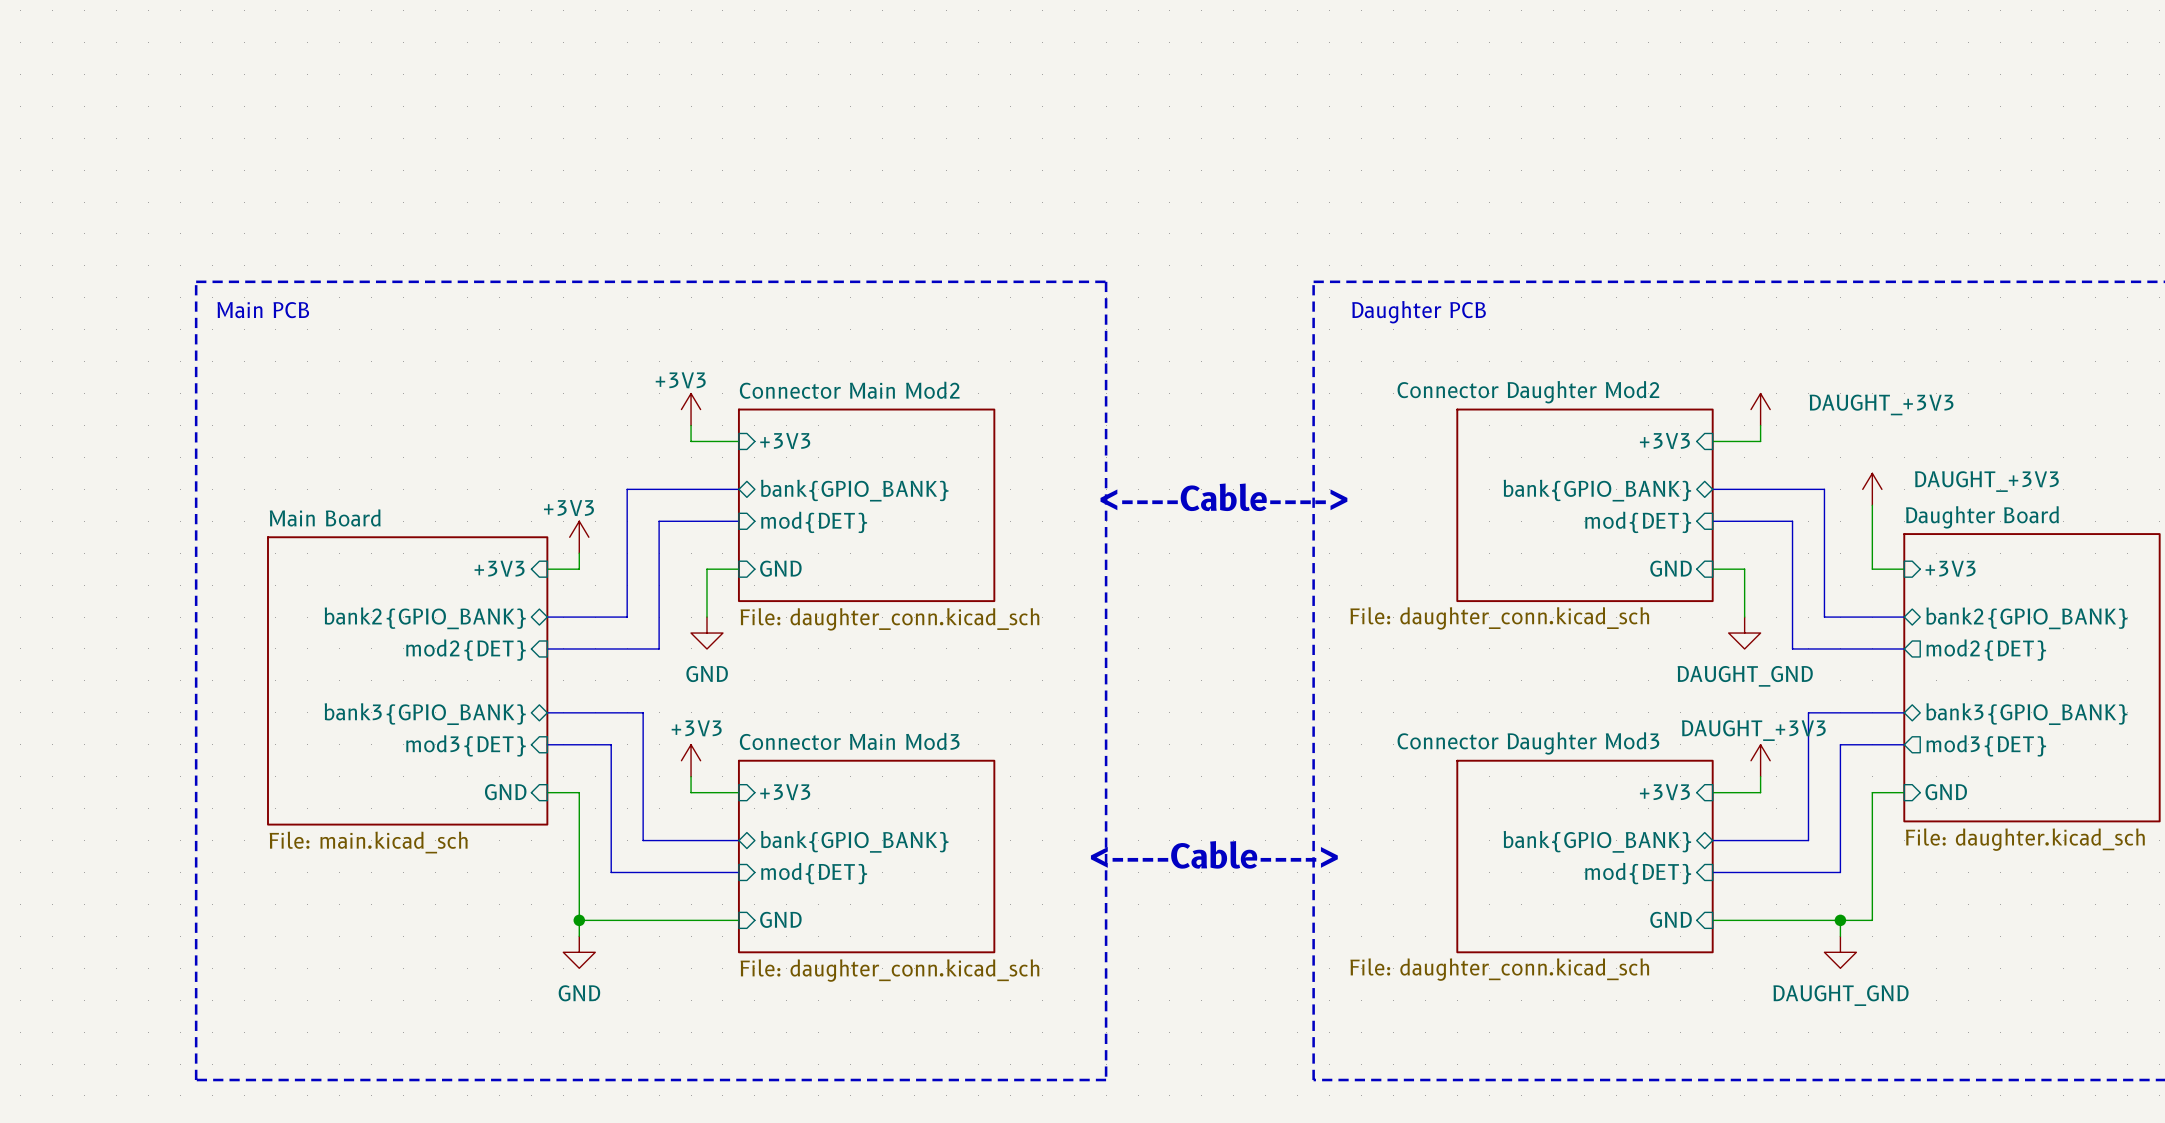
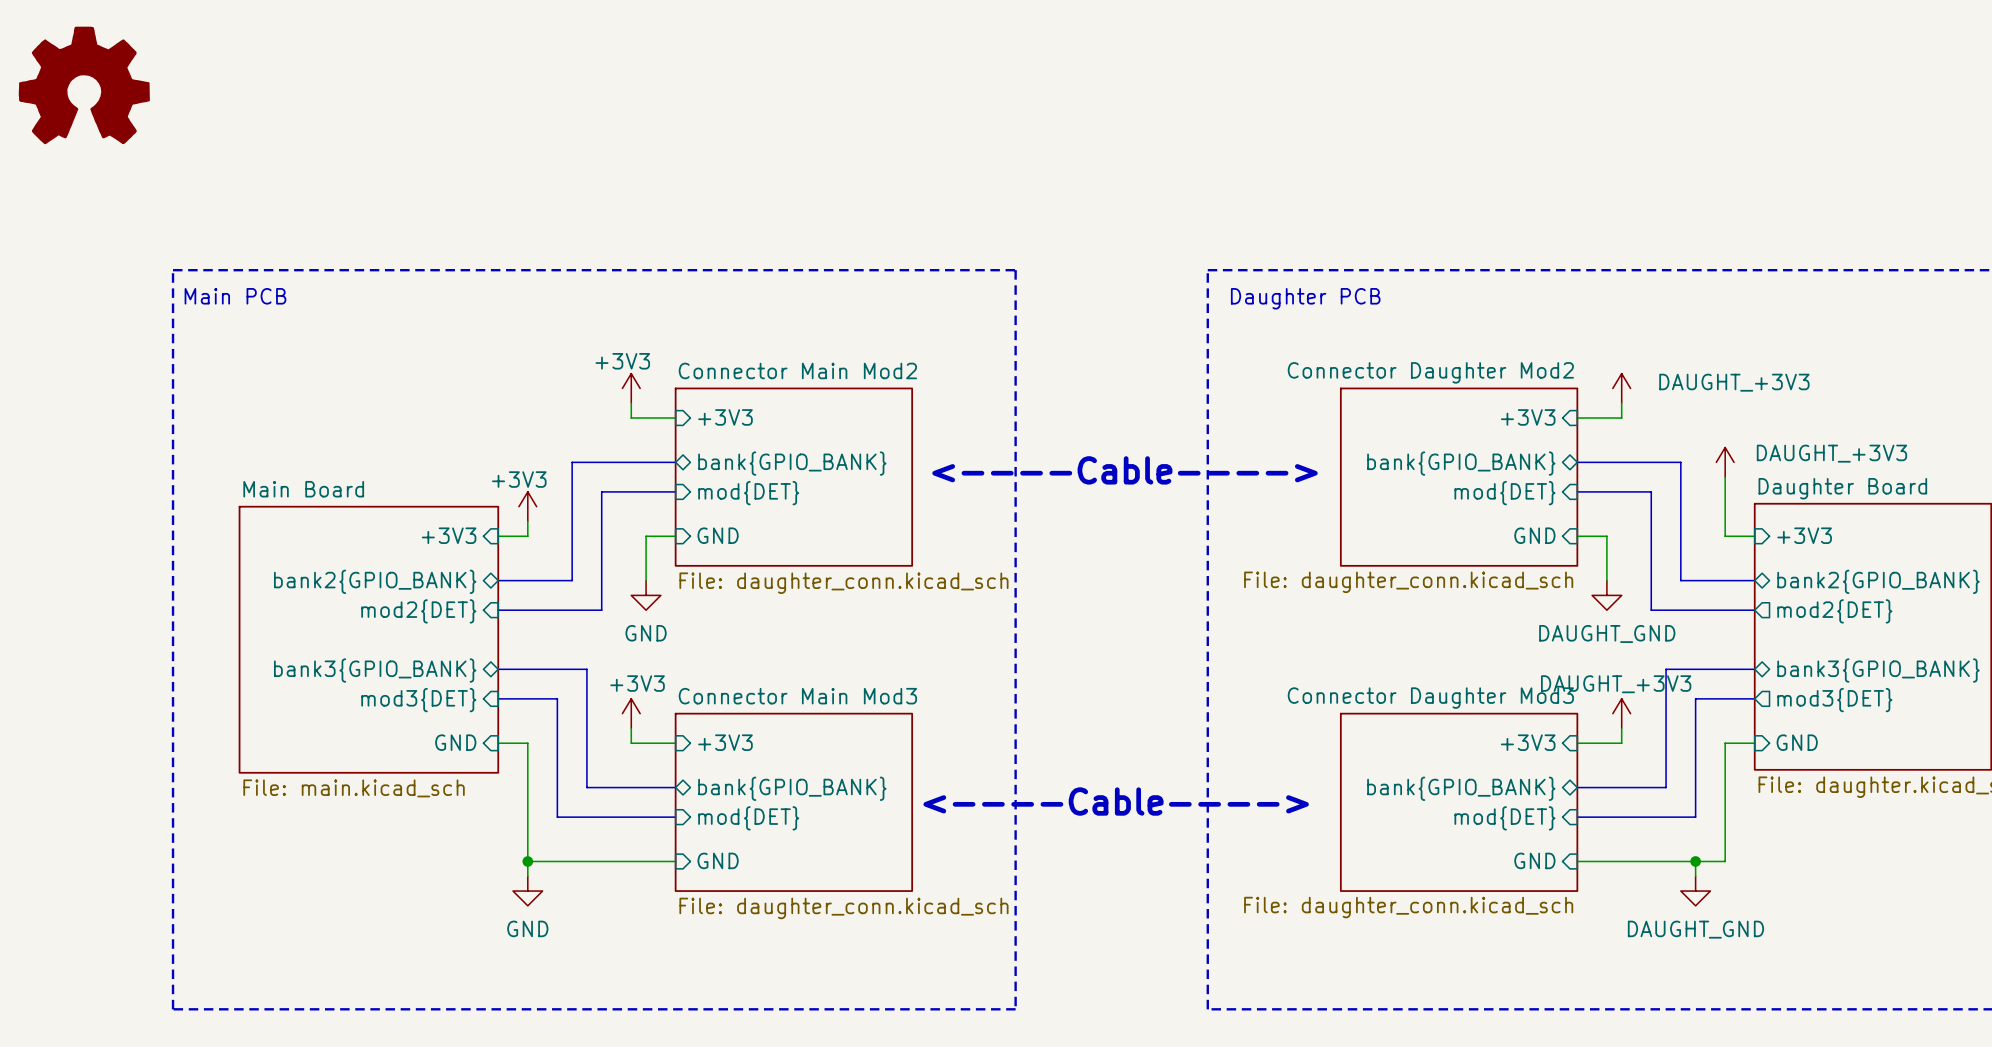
power symbol: none -> (84, 85)

